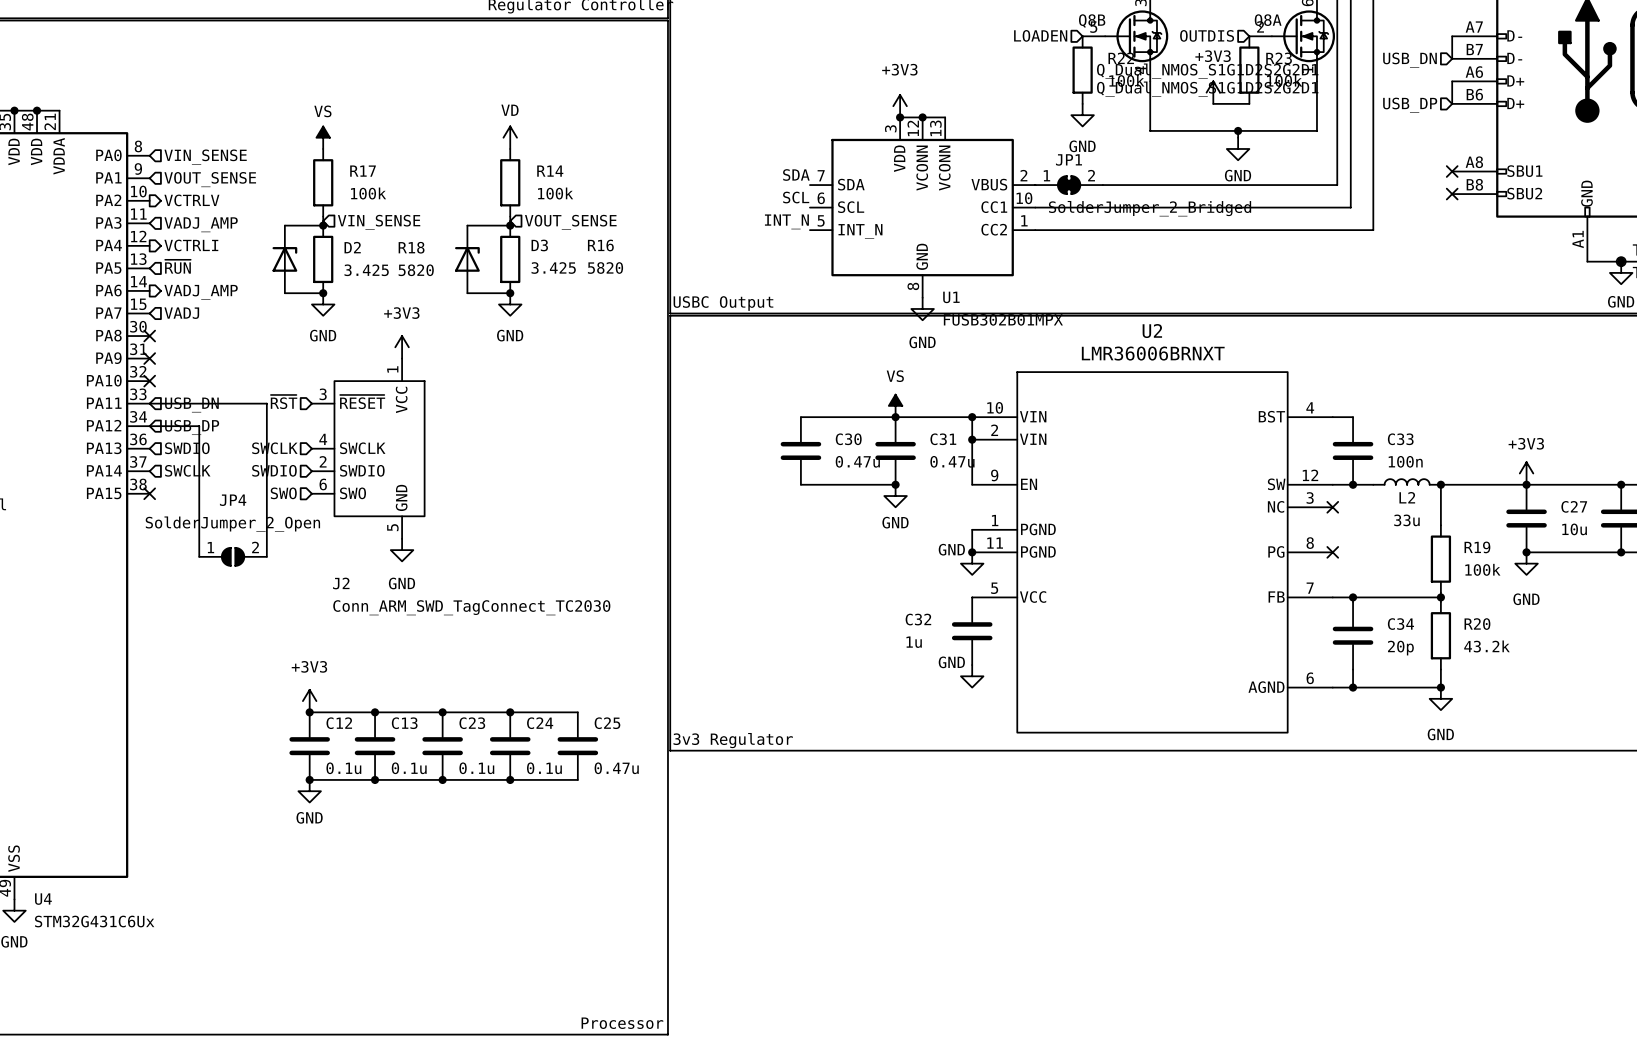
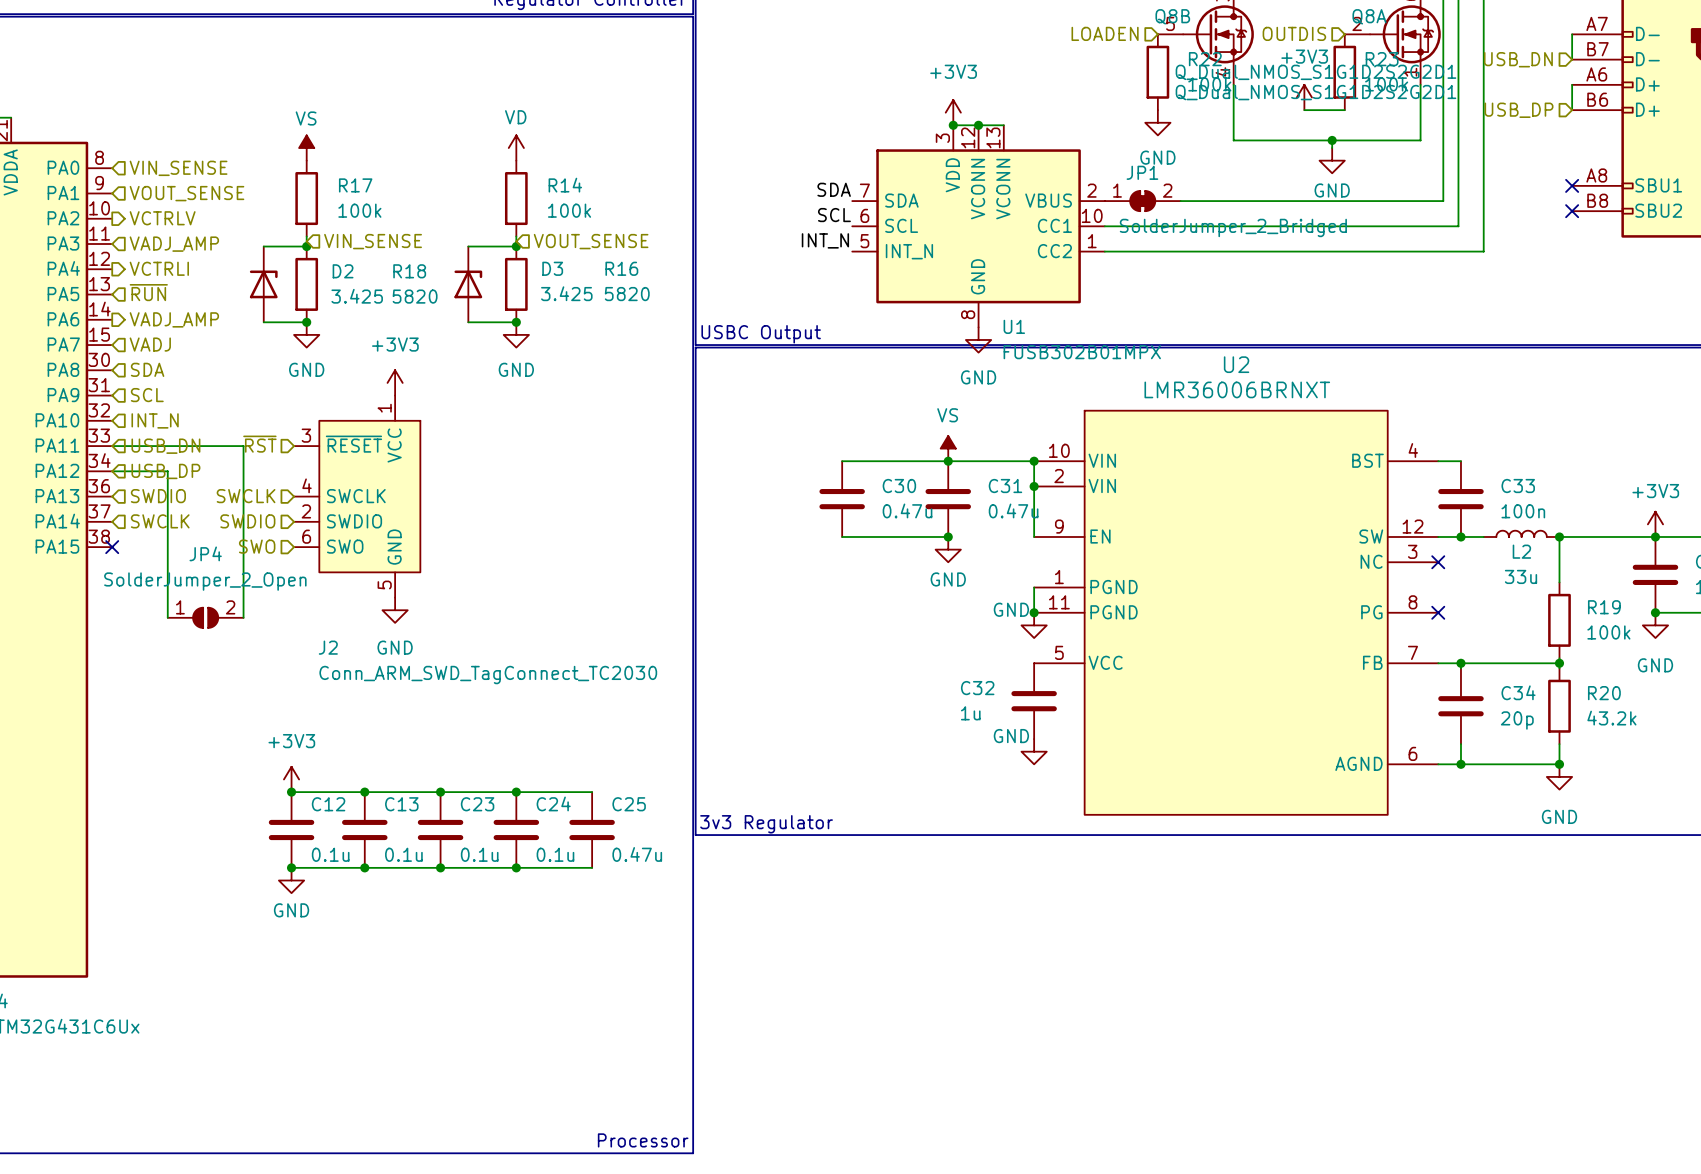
hierarchical label: none -> SDA (147, 369)
no-connect mark: (149, 336) -> none
no-connect mark: (149, 358) -> none
hierarchical label: none -> SCL (147, 395)
no-connect mark: (149, 381) -> none
hierarchical label: none -> INT_N (155, 420)

